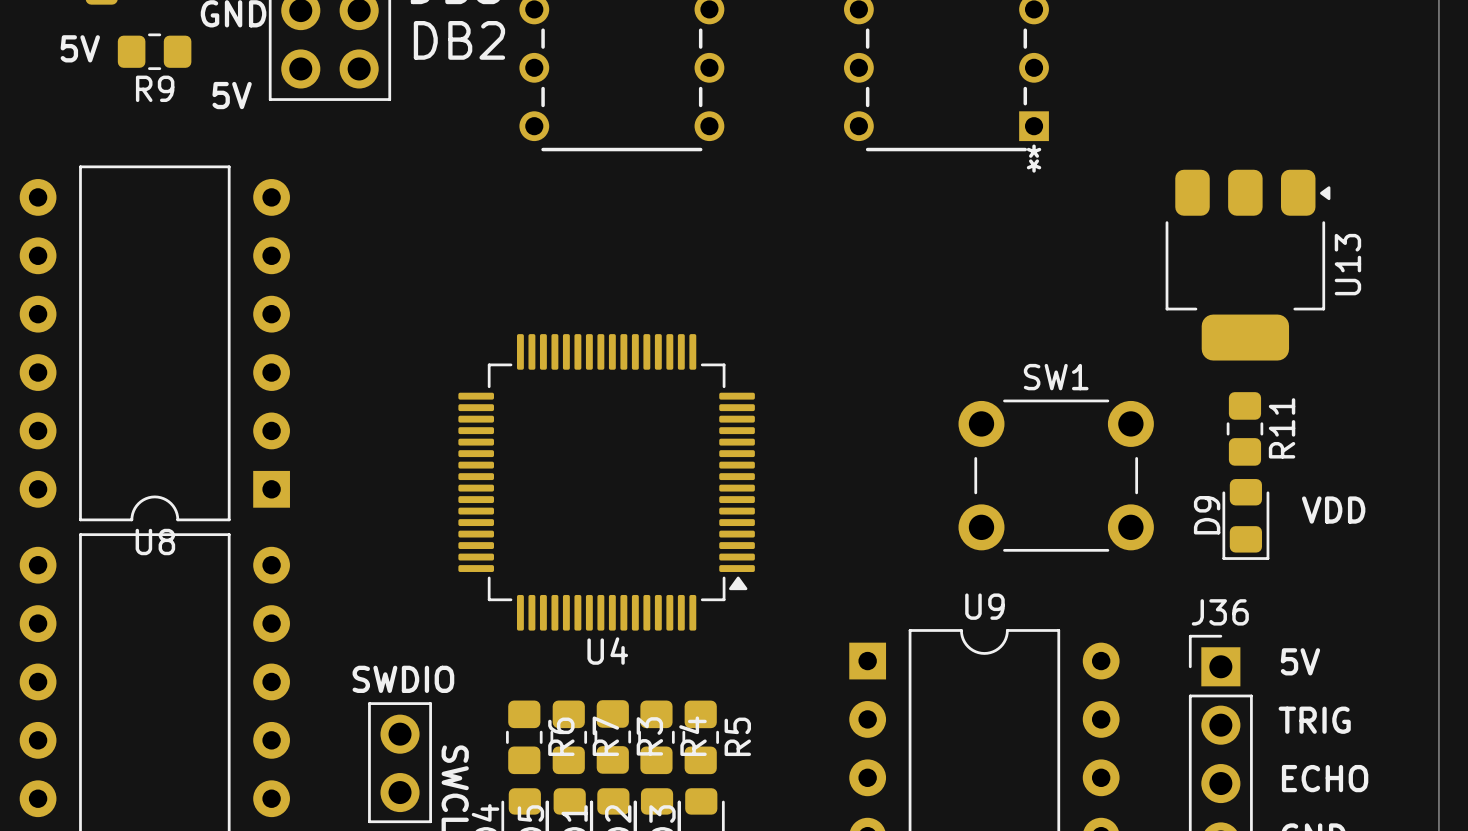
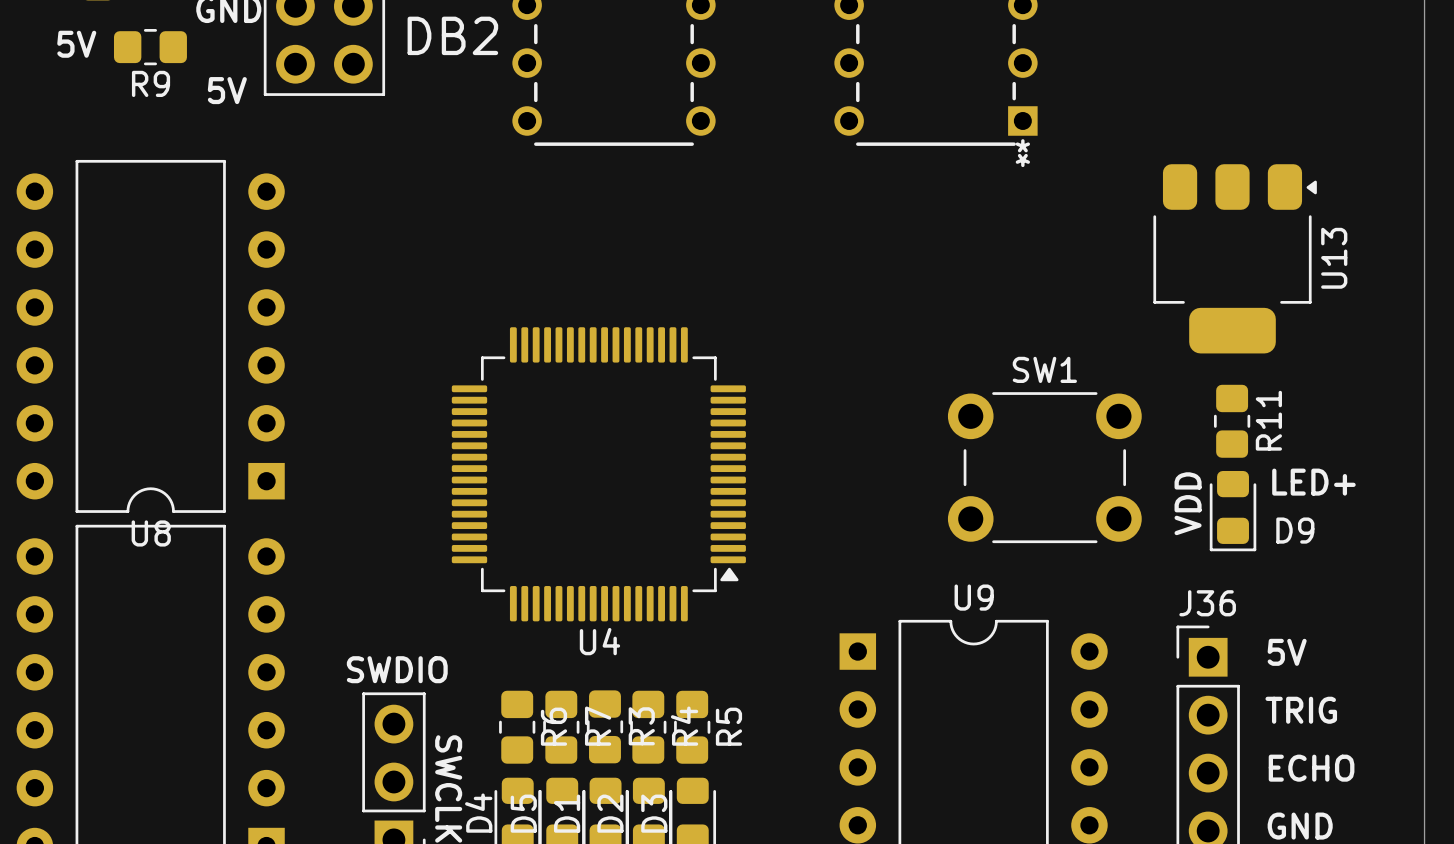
text: none -> LED+ (1313, 482)
text rotation: 0° (1333, 510) -> 90° counterclockwise (1188, 503)
text position: VDD (1333, 510) -> VDD (1188, 503)
D9 name rotation: 0° (1207, 515) -> 90° clockwise (1295, 530)
D9 name position: D9 (1207, 515) -> D9 (1295, 530)

